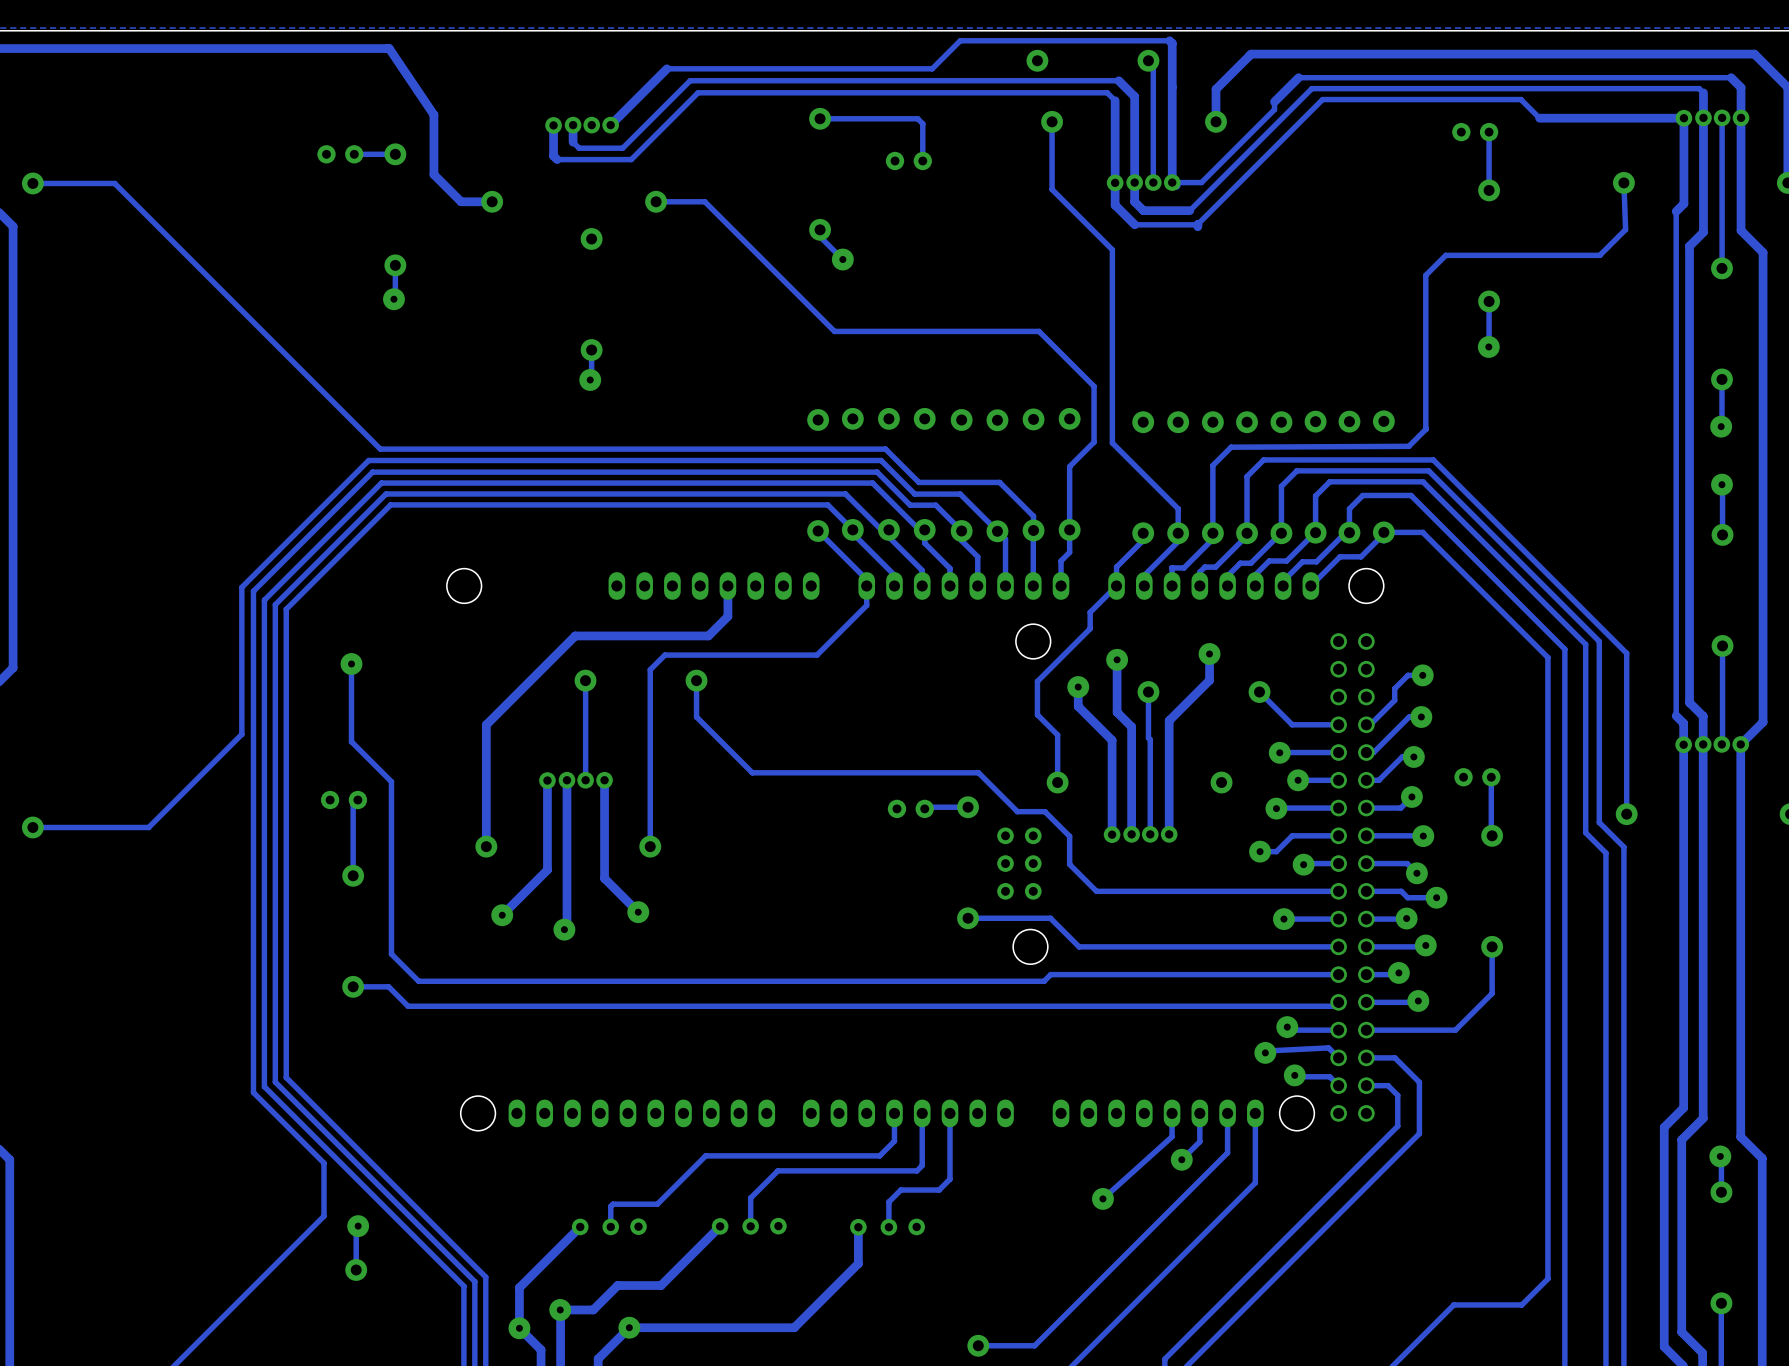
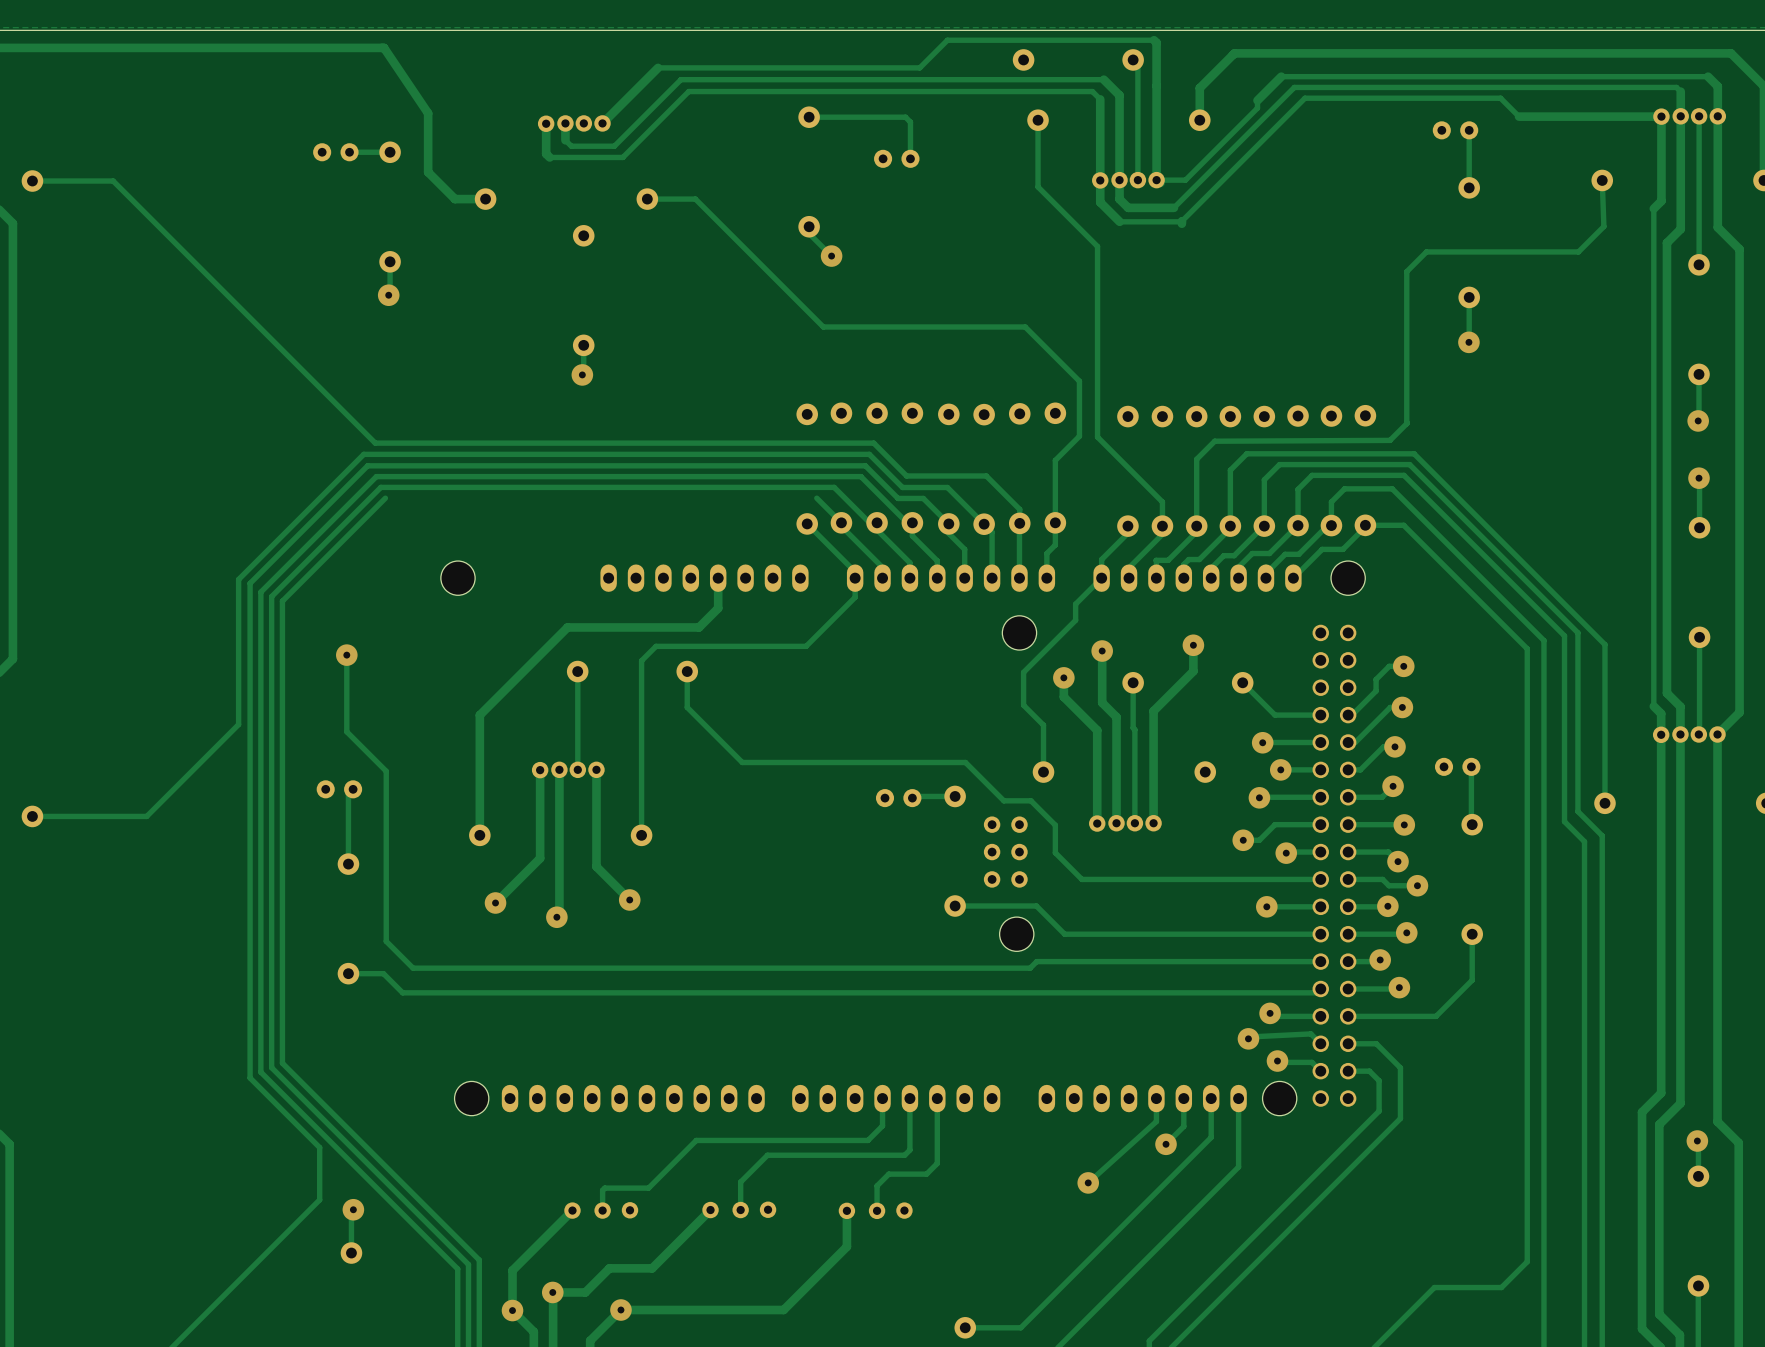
track: (827, 504) (390, 504) -> none

